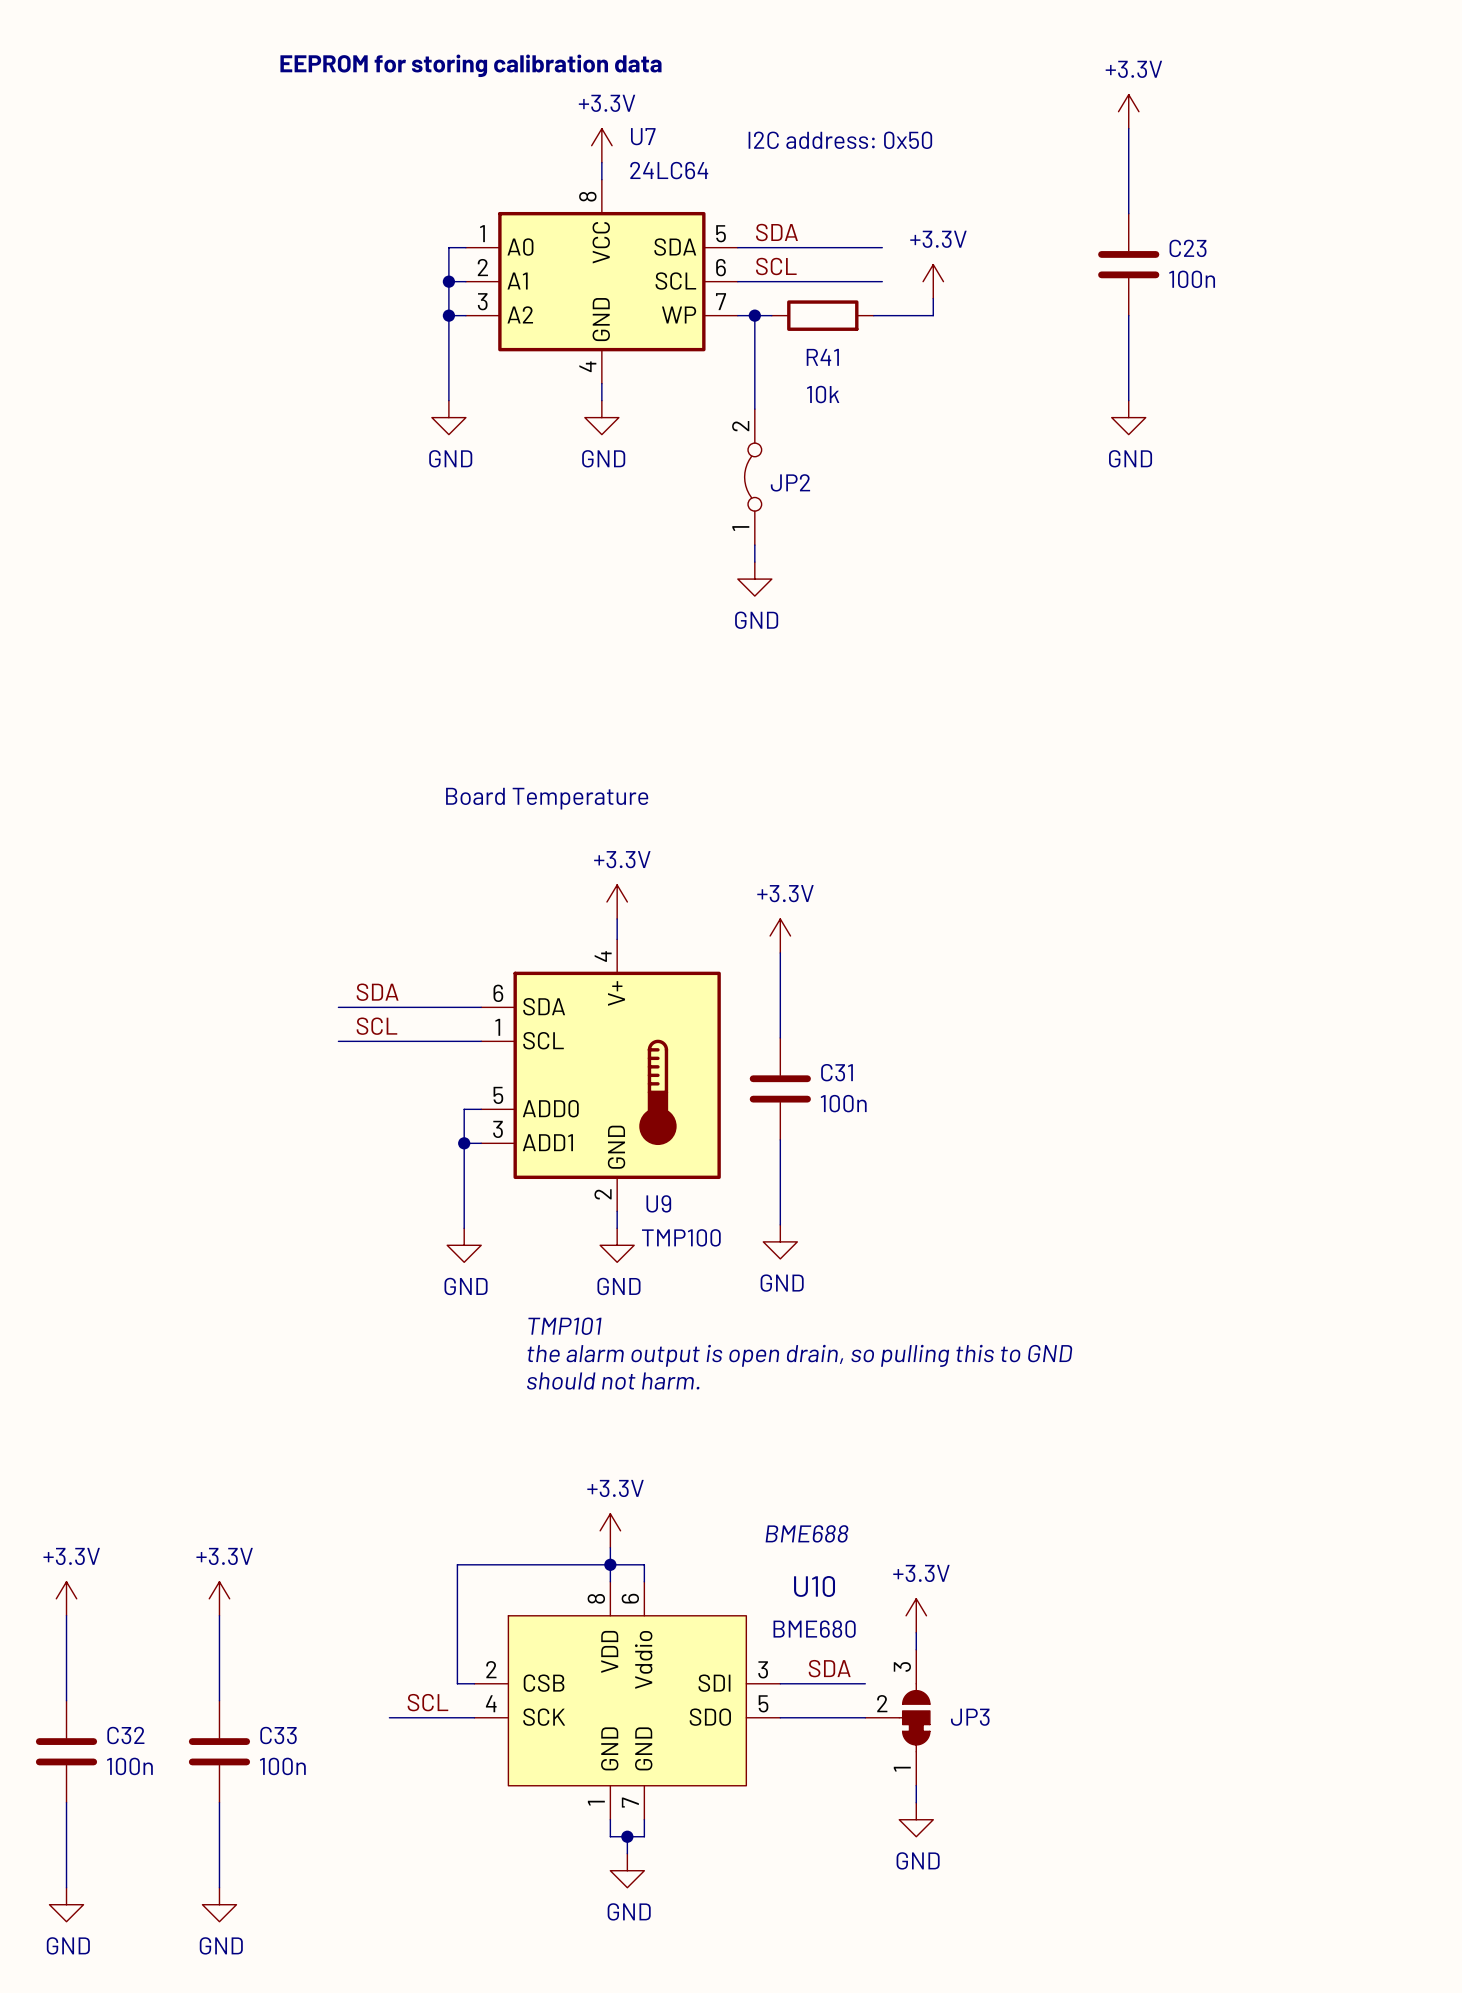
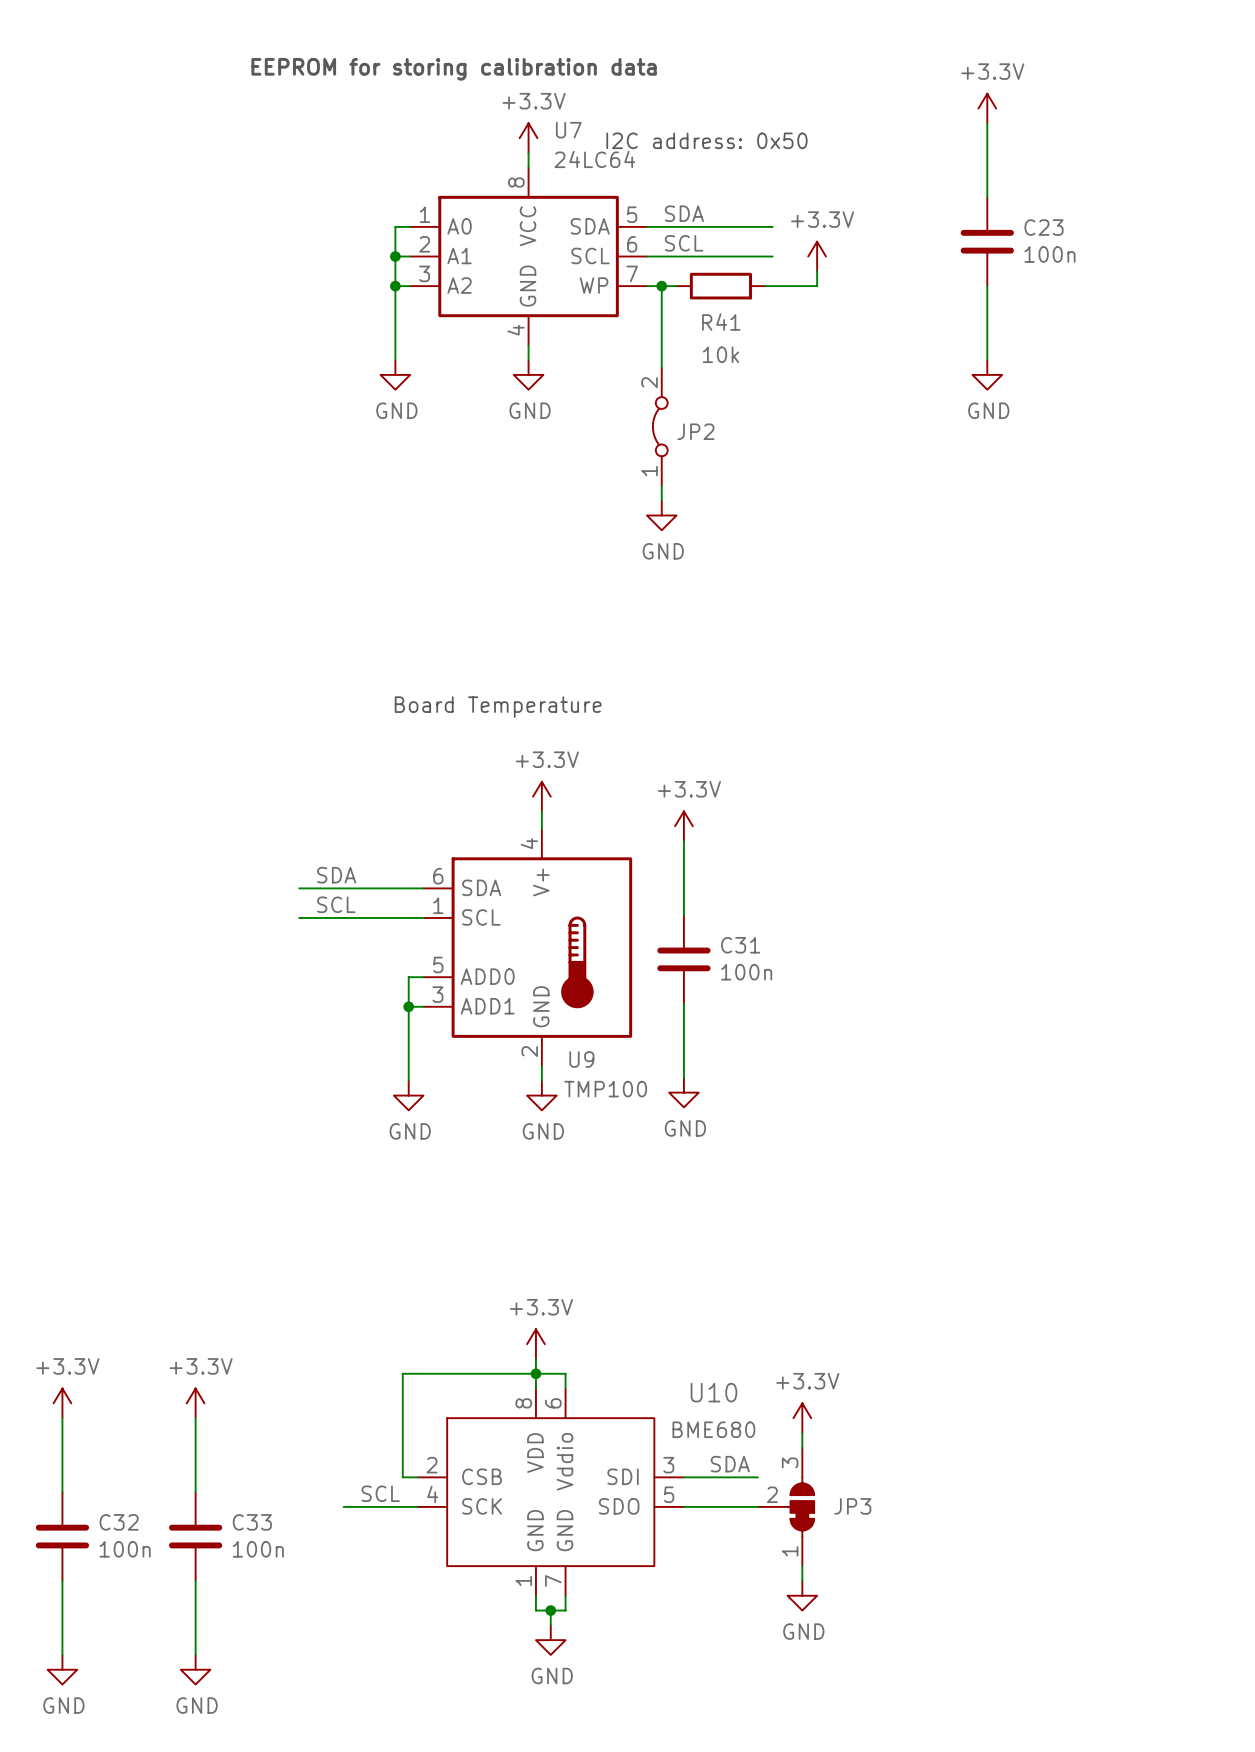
text position: I2C address: 0x50 (840, 140) -> I2C address: 0x50 (706, 140)
text: TMP101 (564, 1326) -> none
text: the alarm output is open drain, so pulling this to GND (800, 1355) -> none
text: should not harm. (613, 1381) -> none
text: BME688 (807, 1533) -> none

